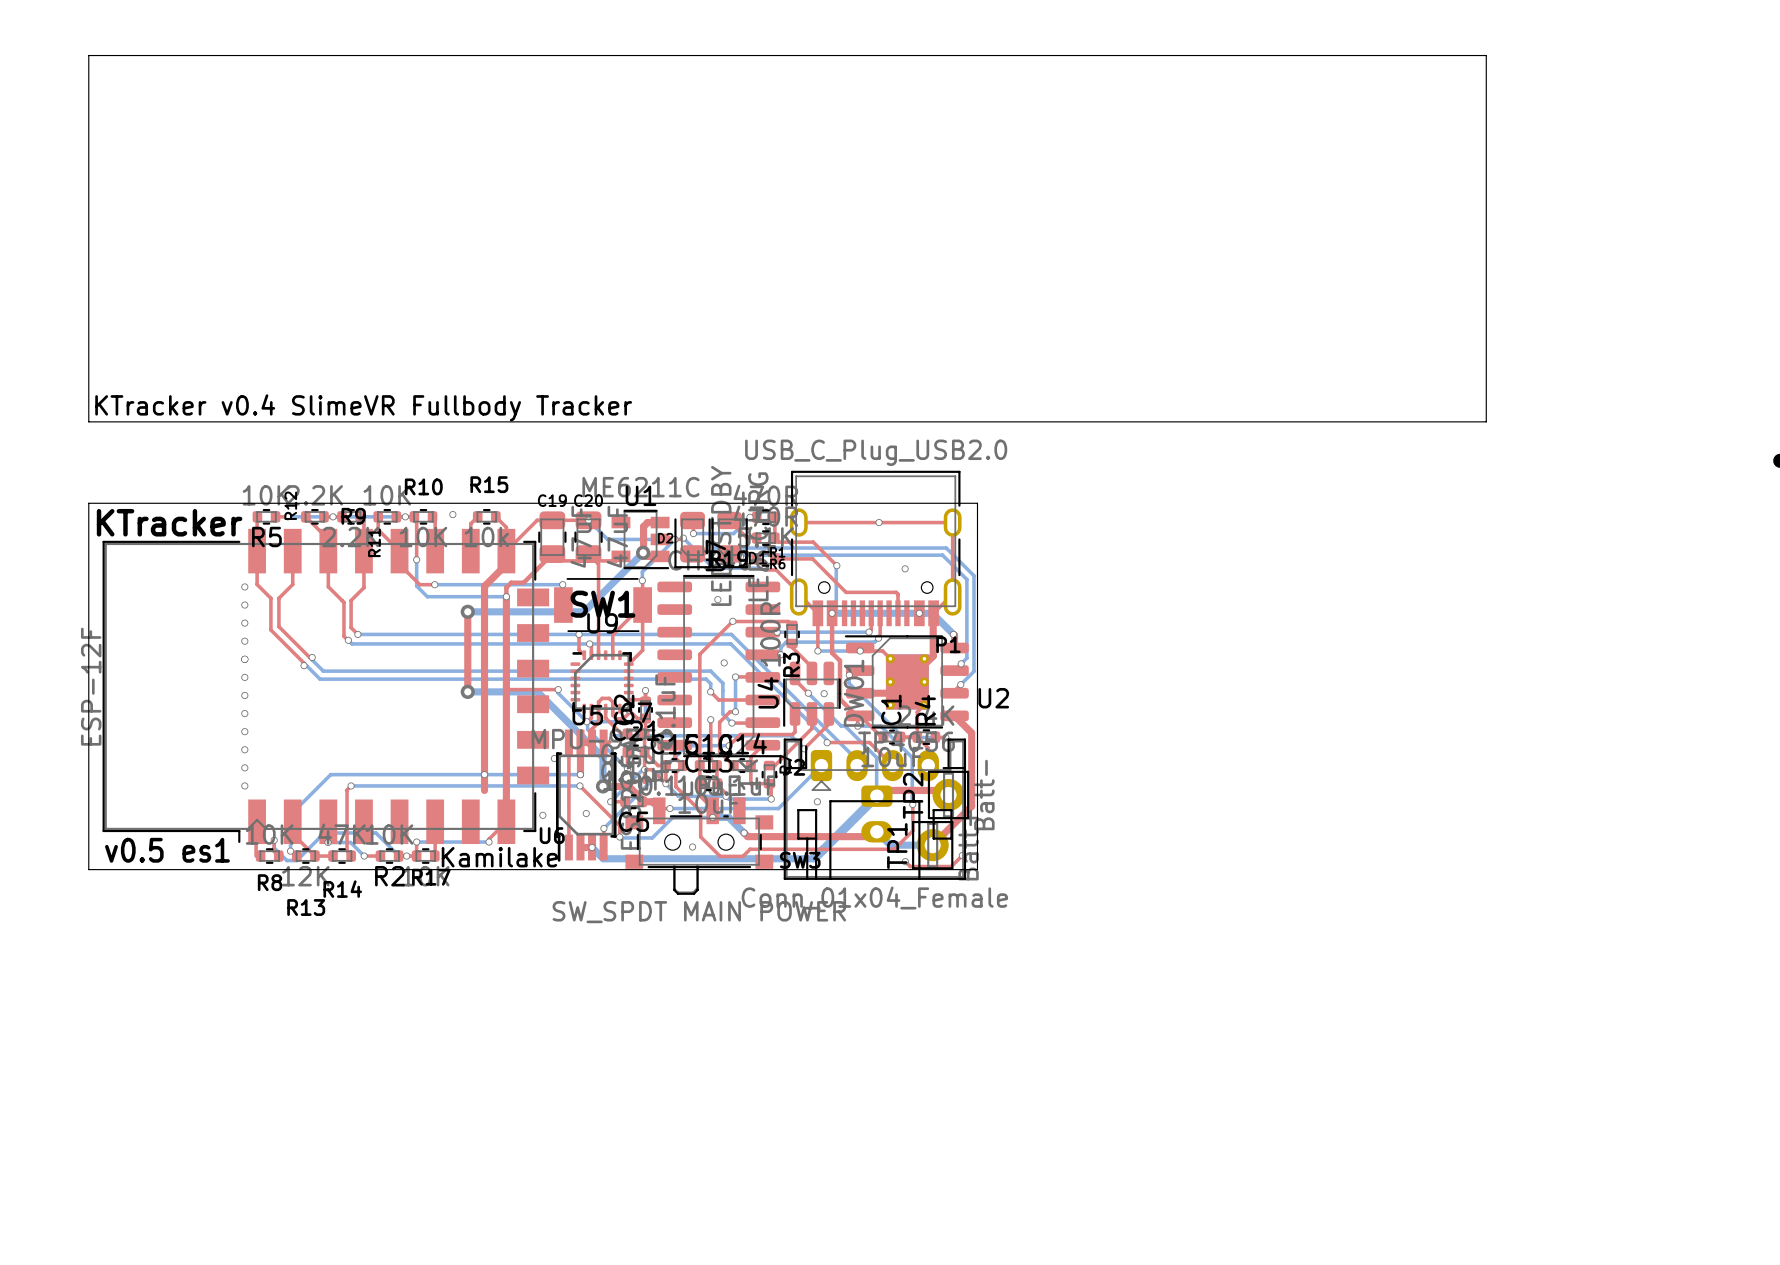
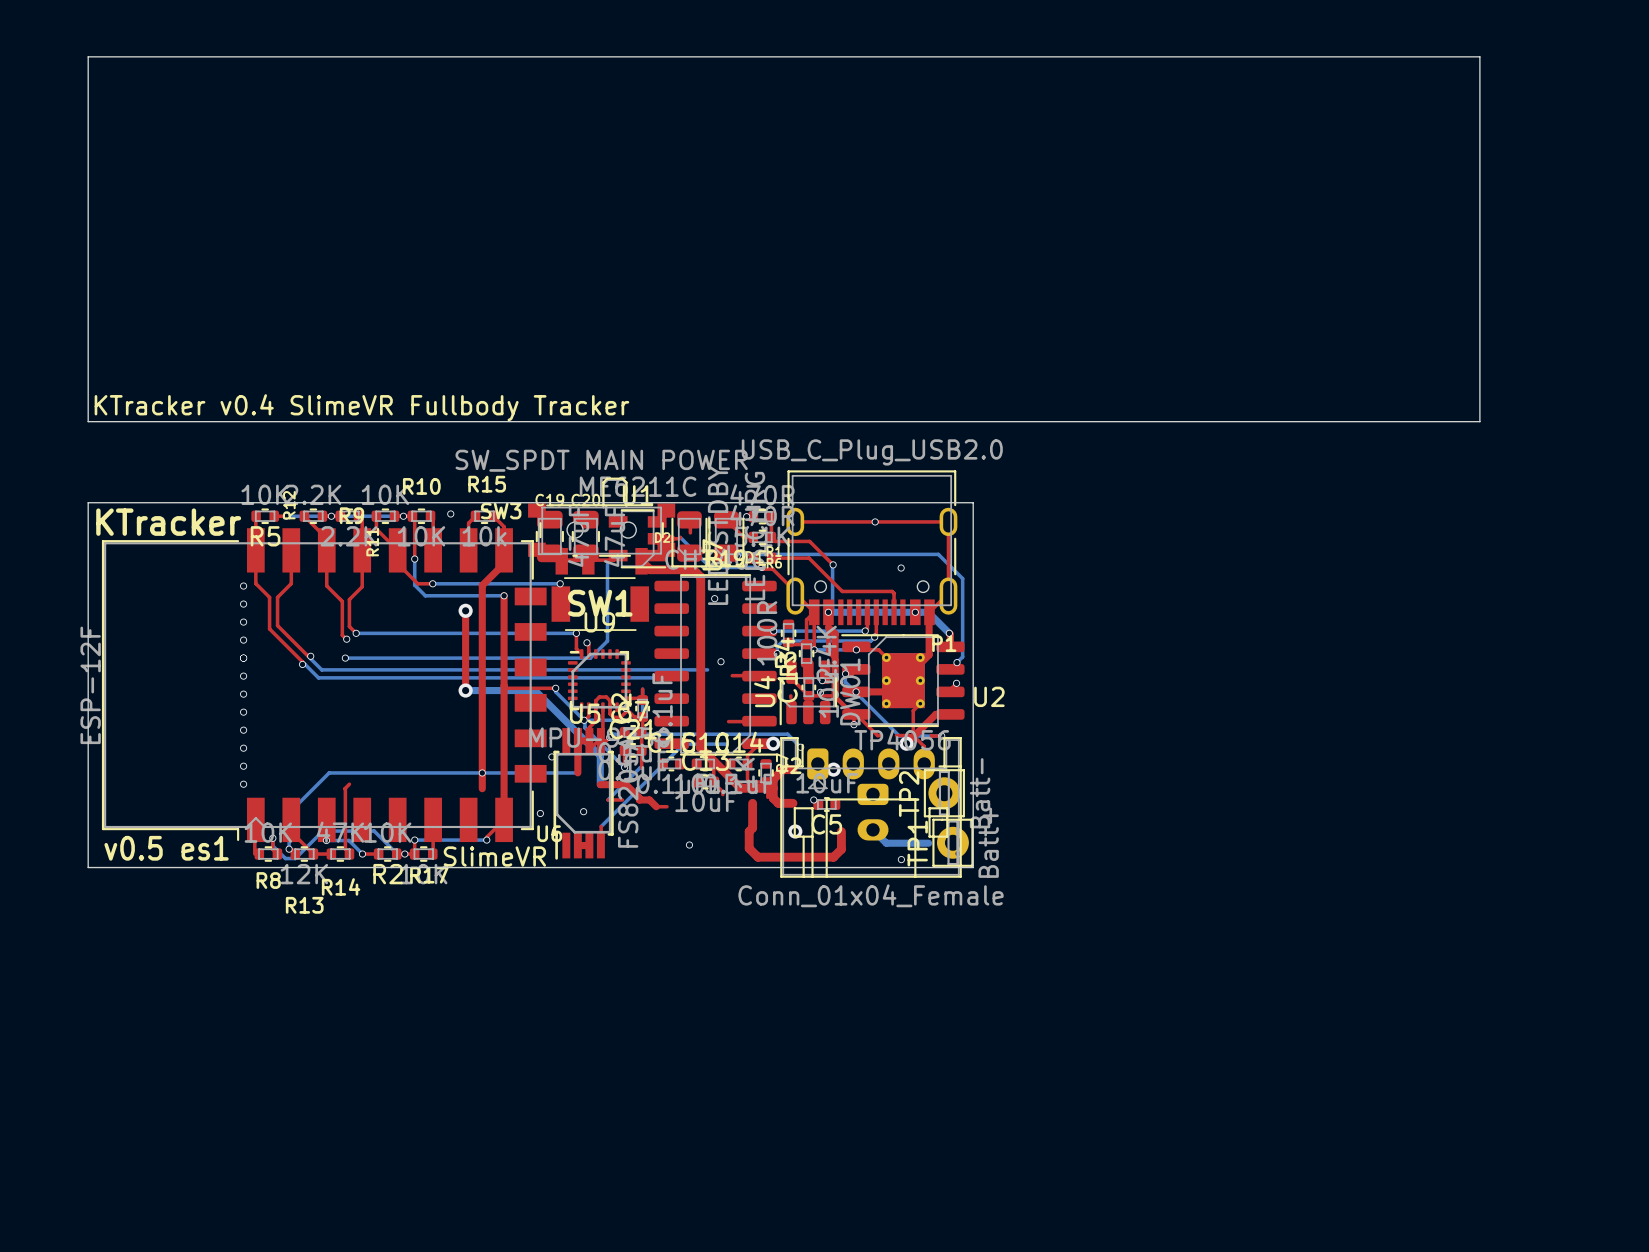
bottom track: (749, 517) (733, 533) (693, 533) -> none
top track: (588, 520) (537, 520) (506, 551) -> none
bottom track: (588, 520) (607, 539) (674, 539) (642, 572) (642, 580) -> none
via: (588, 520) -> none
top track: (660, 522) (647, 522) (643, 526) (643, 552) (647, 556) -> none
via: (693, 533) -> none
via: (683, 538) -> none
via: (674, 539) -> none
bottom track: (710, 547) (946, 548) (973, 575) (973, 671) (960, 684) -> none
bottom track: (643, 552) (584, 611) (467, 611) -> none
via: (643, 552) -> none
top track: (552, 554) (523, 582) (511, 582) (506, 587) (506, 596) -> none
top track: (588, 554) (598, 564) (598, 655) -> none
top track: none -> (641, 561) (650, 569) (693, 569) (700, 577) (700, 748) (740, 788) (773, 788)
bottom track: none -> (607, 564) (607, 640) (590, 658) (345, 658)
top track: (642, 580) (642, 650) (628, 664) -> none
via: (642, 580) -> none
top track: (642, 605) (612, 634) (612, 655) -> none
top track: none -> (813, 613) (806, 619) (806, 644) (790, 644)
top track: (732, 621) (699, 654) (699, 795) (712, 808) -> none
top track: (732, 621) (788, 621) (792, 625) -> none
via: (732, 621) -> none
top track: none -> (828, 627) (835, 634) (835, 698) (832, 695) (808, 695)
bottom track: (579, 634) (731, 634) (857, 760) (857, 765) -> none
bottom track: (348, 640) (352, 643) (730, 643) (827, 740) (827, 742) -> none
top track: (792, 643) (792, 647) (811, 667) (811, 673) -> none
via: none -> (345, 658)
bottom track: (710, 671) (722, 683) (722, 714) (731, 723) -> none
bottom track: (735, 676) (735, 711) -> none
via: (735, 676) -> none
bottom track: (685, 679) (706, 679) (710, 683) (710, 691) -> none
via: (645, 690) -> none
top track: (710, 691) (718, 700) (762, 700) -> none
via: (710, 691) -> none
bottom track: (808, 693) (876, 757) (876, 795) -> none
via position: (808, 693) -> (822, 680)
via: none -> (856, 691)
top track: none -> (790, 695) (790, 697)
top track: (735, 711) (730, 711) (719, 722) (719, 751) (733, 765) -> none
via: (735, 711) -> none
top track: (795, 713) (795, 732) (792, 734) (740, 734) (729, 745) -> none
top track: (811, 713) (811, 728) (774, 765) (769, 765) -> none
top track: (828, 713) (828, 724) (804, 748) -> none
top track: (954, 715) (971, 732) (971, 806) (932, 845) -> (950, 714) (935, 714) (906, 743)
top track: (605, 718) (621, 733) (627, 733) -> (602, 716) (602, 736) (593, 745)
top track: (710, 719) (710, 759) (716, 765) -> none
via: (710, 719) -> none
via: (731, 723) -> none
bottom track: (857, 726) (880, 726) (912, 757) (912, 804) -> none
C1 rotation: 0° (892, 737) -> 90° clockwise (808, 687)
C1 position: (892, 737) -> (808, 687)
R4 rotation: 0° (926, 737) -> 90° clockwise (806, 653)
R4 position: (926, 737) -> (806, 653)
top track: (568, 742) (568, 847) -> none
top track: (827, 742) (869, 742) (892, 765) -> none
via: (827, 742) -> none
top track: (669, 745) (674, 745) (674, 757) (683, 765) (675, 772) (675, 786) (700, 811) (700, 836) (720, 856) (742, 856) (750, 849) (894, 849) (912, 830) (912, 804) -> none
via: (729, 745) -> none
via: none -> (773, 743)
via: none -> (906, 743)
top track: (644, 752) (658, 765) (665, 765) (665, 783) (651, 769) (644, 769) (644, 782) -> none
bottom track: (821, 765) (778, 808) (669, 808) -> none
via: (644, 769) -> none
top track: none -> (792, 769) (783, 769) (773, 779) (773, 798) (778, 803) (792, 803)
via: none -> (833, 769)
via: (580, 774) -> none
bottom track: (665, 783) (678, 796) (771, 799) -> none
via: (665, 783) -> none
bottom track: (351, 785) (579, 785) -> none
via: (351, 785) -> none
top track: (579, 785) (619, 825) (619, 837) -> none
via: (579, 785) -> none
via: (603, 786) -> none
bottom track: (878, 794) (817, 855) -> none
top track: (949, 794) (946, 790) (882, 790) (876, 796) -> none
via: (726, 796) -> none
via: (771, 799) -> none
via: (610, 801) -> none
C5 position: (633, 801) -> (826, 804)
via: (912, 804) -> none
top track: none -> (752, 803) (752, 828) (749, 831) (749, 848) (757, 857) (833, 857) (841, 849) (841, 831)
via: (669, 808) -> none
via: (712, 817) -> none
via: (603, 828) -> none
top track: (876, 831) (872, 836) (747, 836) (744, 832) -> none
bottom track: (744, 832) (728, 817) (672, 817) (652, 837) (619, 837) -> none
via: (744, 832) -> none
via: none -> (795, 831)
via: (619, 837) -> none
TP1 position: (932, 845) -> (952, 842)
SW3 rotation: 0° (699, 846) -> 180° (601, 526)
SW3 position: (699, 846) -> (601, 526)
bottom track: (592, 847) (603, 858) (814, 858) (823, 849) -> none
via: (592, 847) -> none
top track: (962, 855) (951, 866) (910, 866) (905, 861) -> none
text: Kamilake (499, 857) -> SlimeVR (494, 856)

